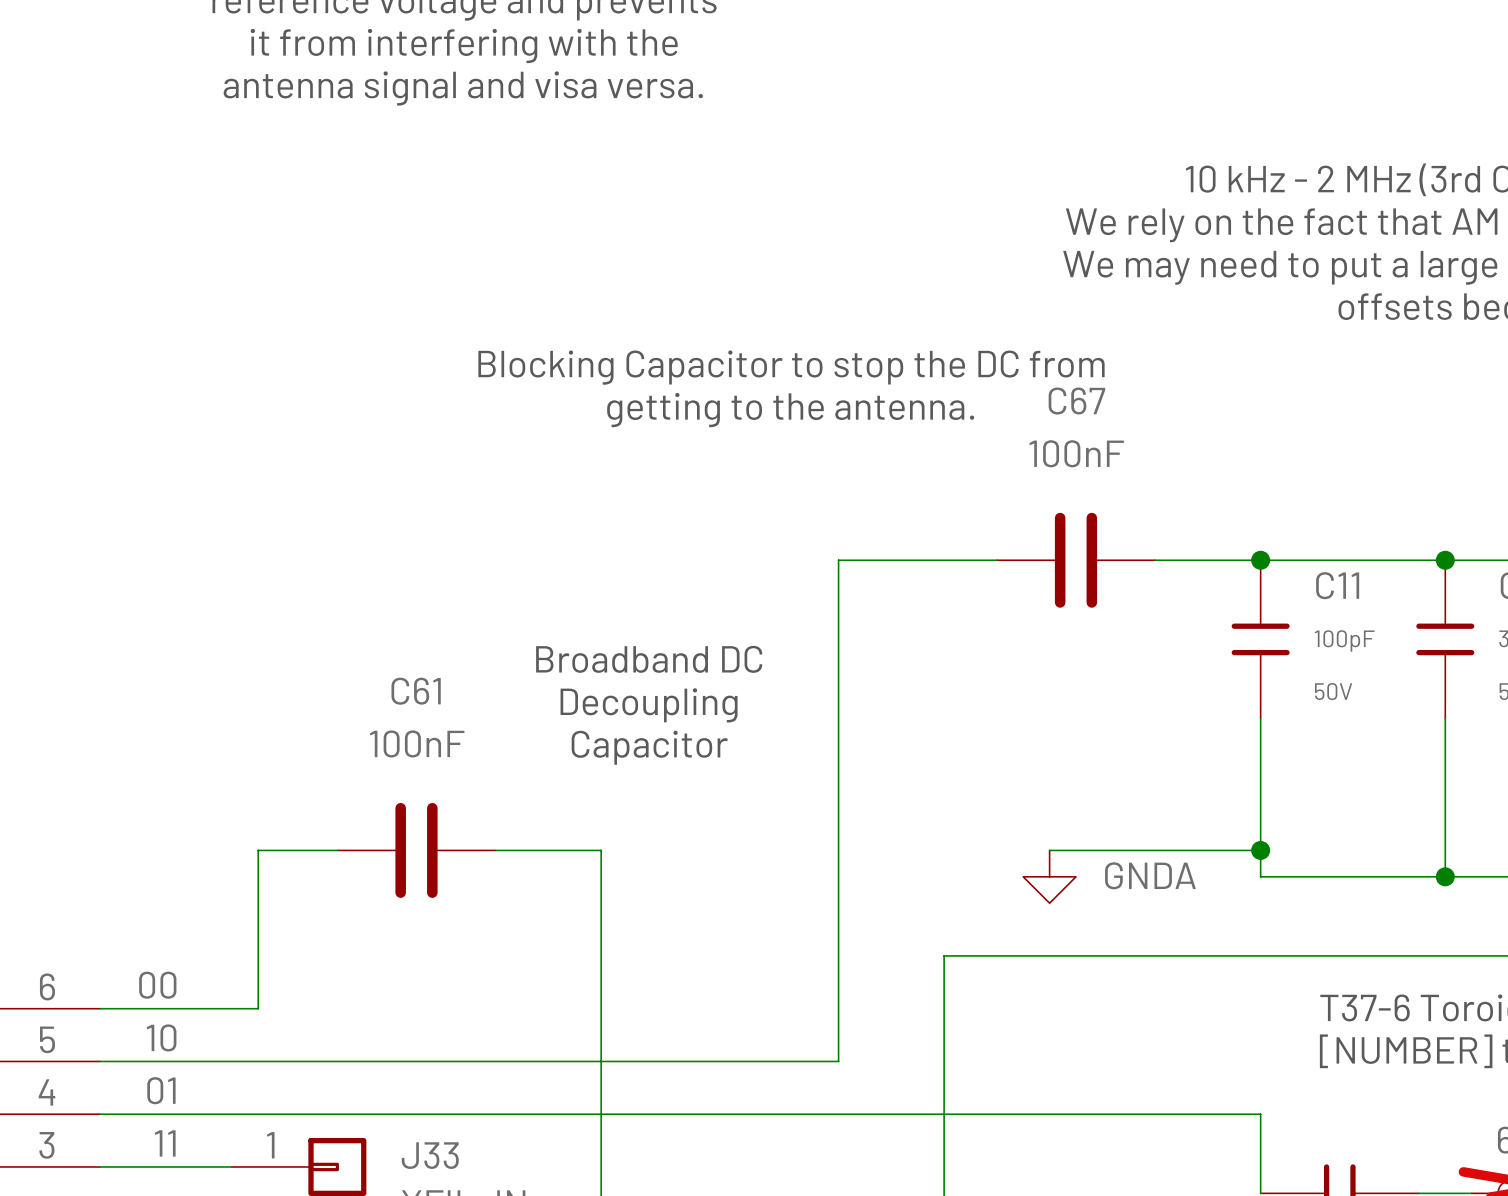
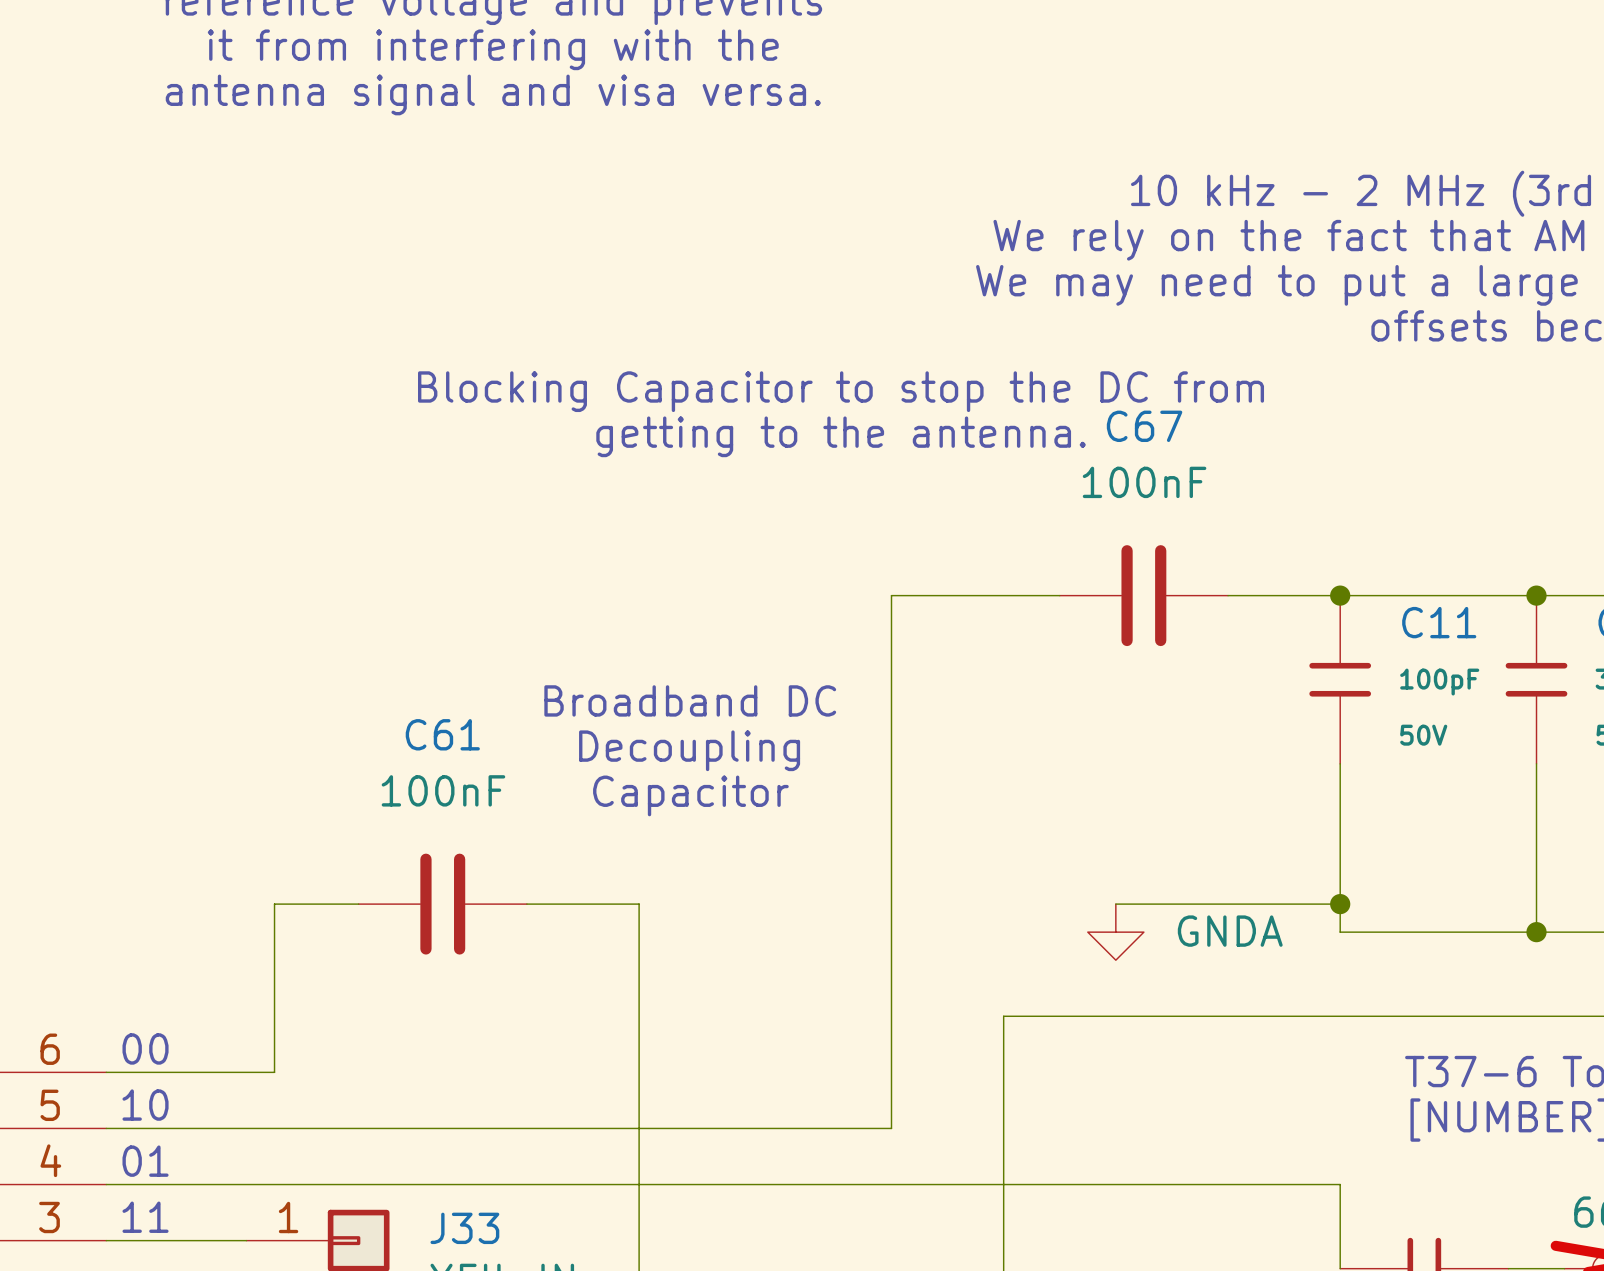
label: 00 (157, 985) -> none
text: none -> 00 (145, 1048)
label: 10 (161, 1037) -> none
text: none -> 10 (145, 1105)
label: 01 (161, 1090) -> none
text: none -> 01 (145, 1161)
label: 11 (165, 1143) -> none
text: none -> 11 (145, 1217)

